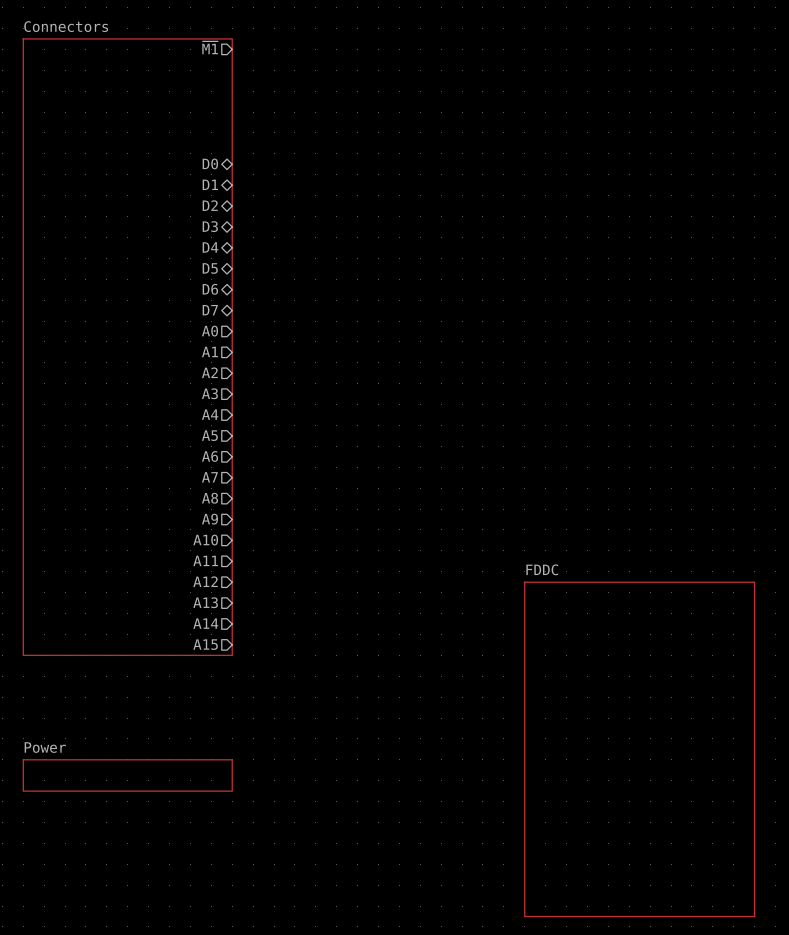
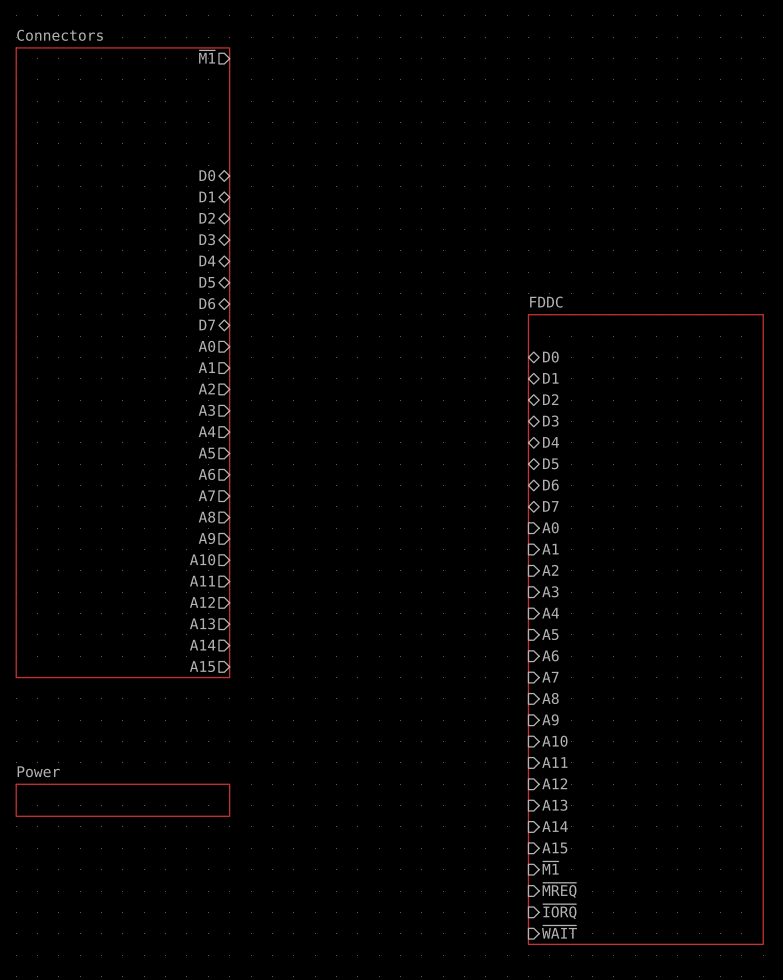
sheet pin: none -> D0 (550, 357)
sheet pin: none -> D1 (550, 378)
sheet pin: none -> D2 (550, 399)
sheet pin: none -> D3 (550, 421)
sheet pin: none -> D4 (550, 442)
sheet pin: none -> D5 (550, 463)
sheet pin: none -> D6 (550, 485)
sheet pin: none -> D7 (550, 506)
sheet pin: none -> A0 (550, 527)
sheet pin: none -> A1 (550, 549)
sheet pin: none -> A2 (550, 570)
sheet pin: none -> A3 (550, 591)
sheet pin: none -> A4 (550, 613)
sheet FDDC: none -> (645, 629)
sheet pin: none -> A5 (550, 634)
sheet pin: none -> A6 (550, 655)
sheet pin: none -> A7 (550, 677)
sheet pin: none -> A8 (550, 698)
sheet pin: none -> A9 (550, 719)
sheet pin: none -> A10 (554, 741)
sheet pin: none -> A11 (554, 762)
sheet FDDC: (639, 749) -> none
sheet pin: none -> A12 (554, 783)
sheet pin: none -> A13 (554, 805)
sheet pin: none -> A14 (555, 826)
sheet pin: none -> A15 (554, 848)
sheet pin: none -> ~{M1} (550, 868)
sheet pin: none -> ~{MREQ} (559, 890)
sheet pin: none -> ~{IORQ} (559, 911)
sheet pin: none -> ~{WAIT} (559, 932)

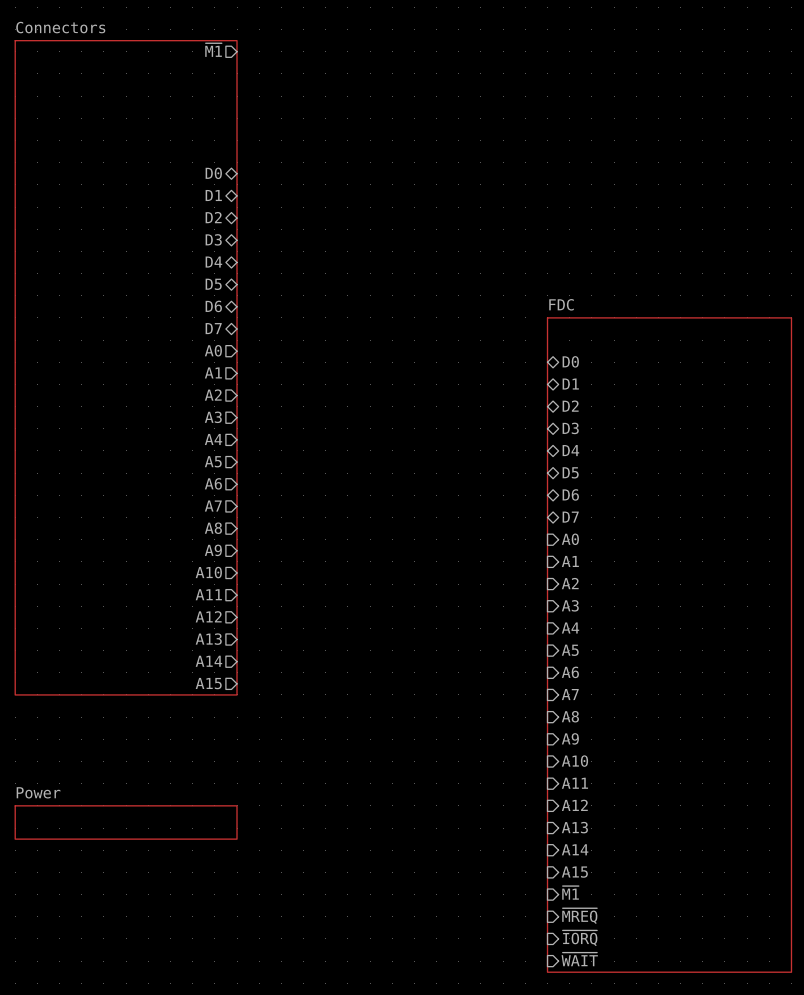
sheet FDDC name: FDDC (546, 302) -> FDC (561, 304)

